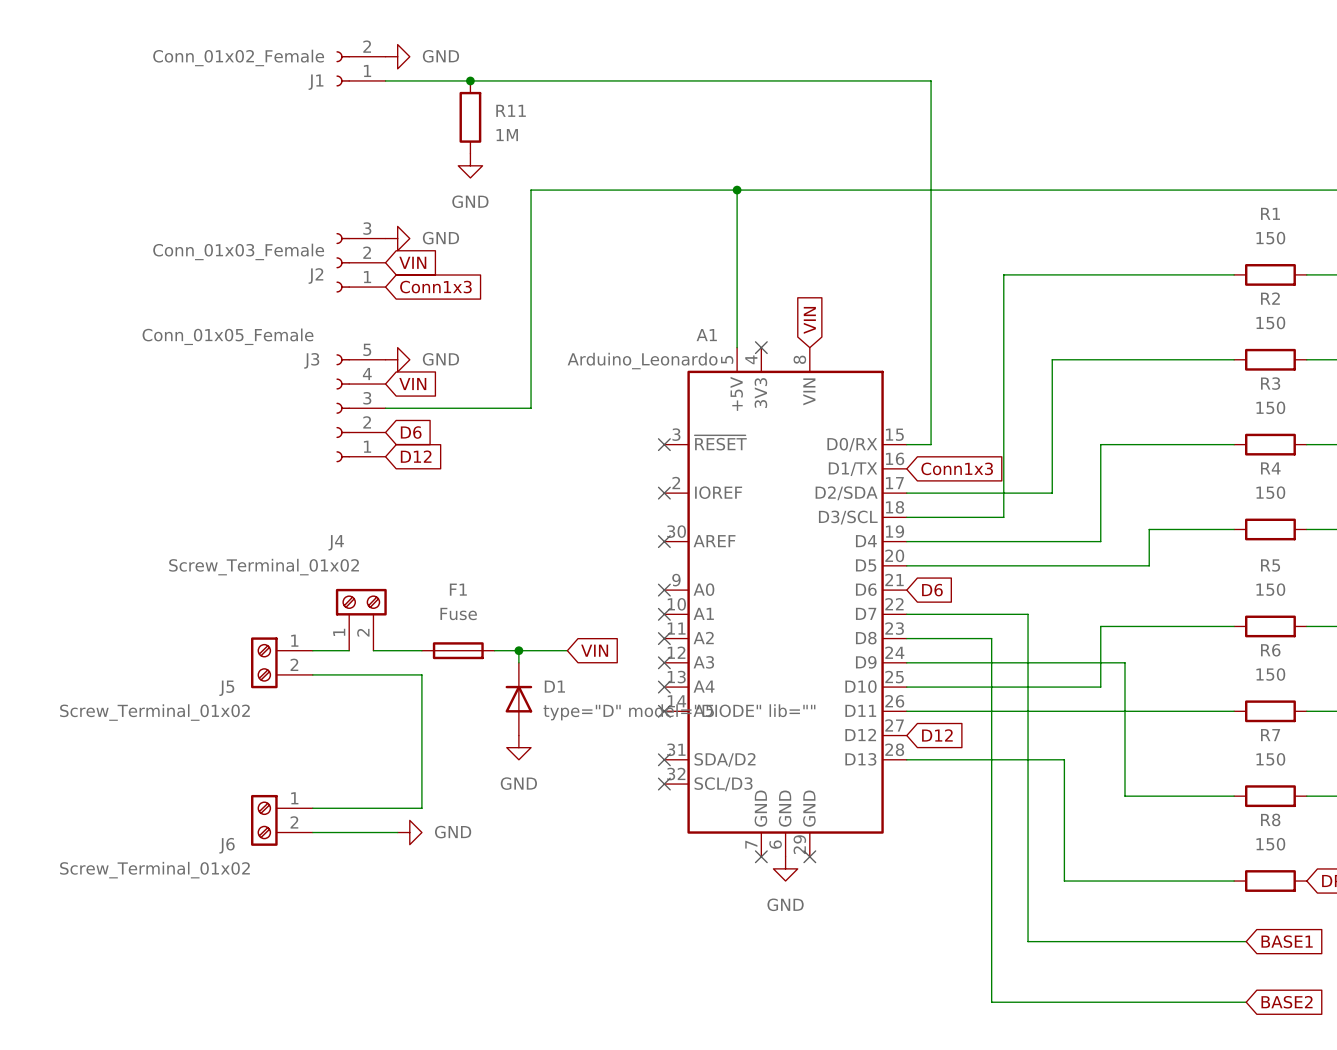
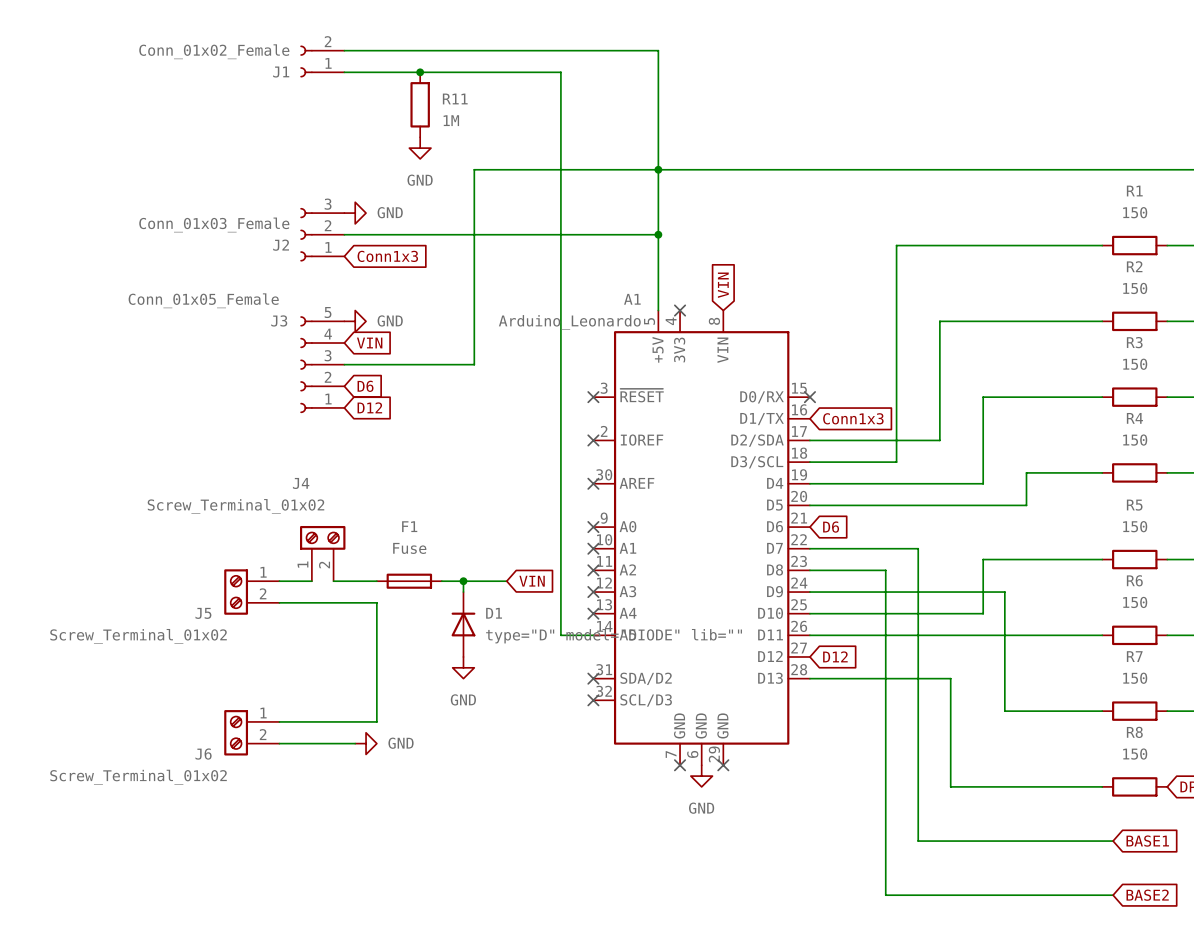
wire: none -> (344, 50) (658, 50) (658, 169)
power symbol: GND (397, 56) -> none
wire: (628, 80) (931, 80) (931, 444) (906, 444) -> (560, 72) (560, 635) (593, 635)
wire: none -> (344, 234) (658, 234)
global label: VIN (412, 262) -> none
junction: none -> (658, 234)
no-connect mark: none -> (809, 397)
no-connect mark: (664, 711) -> none

